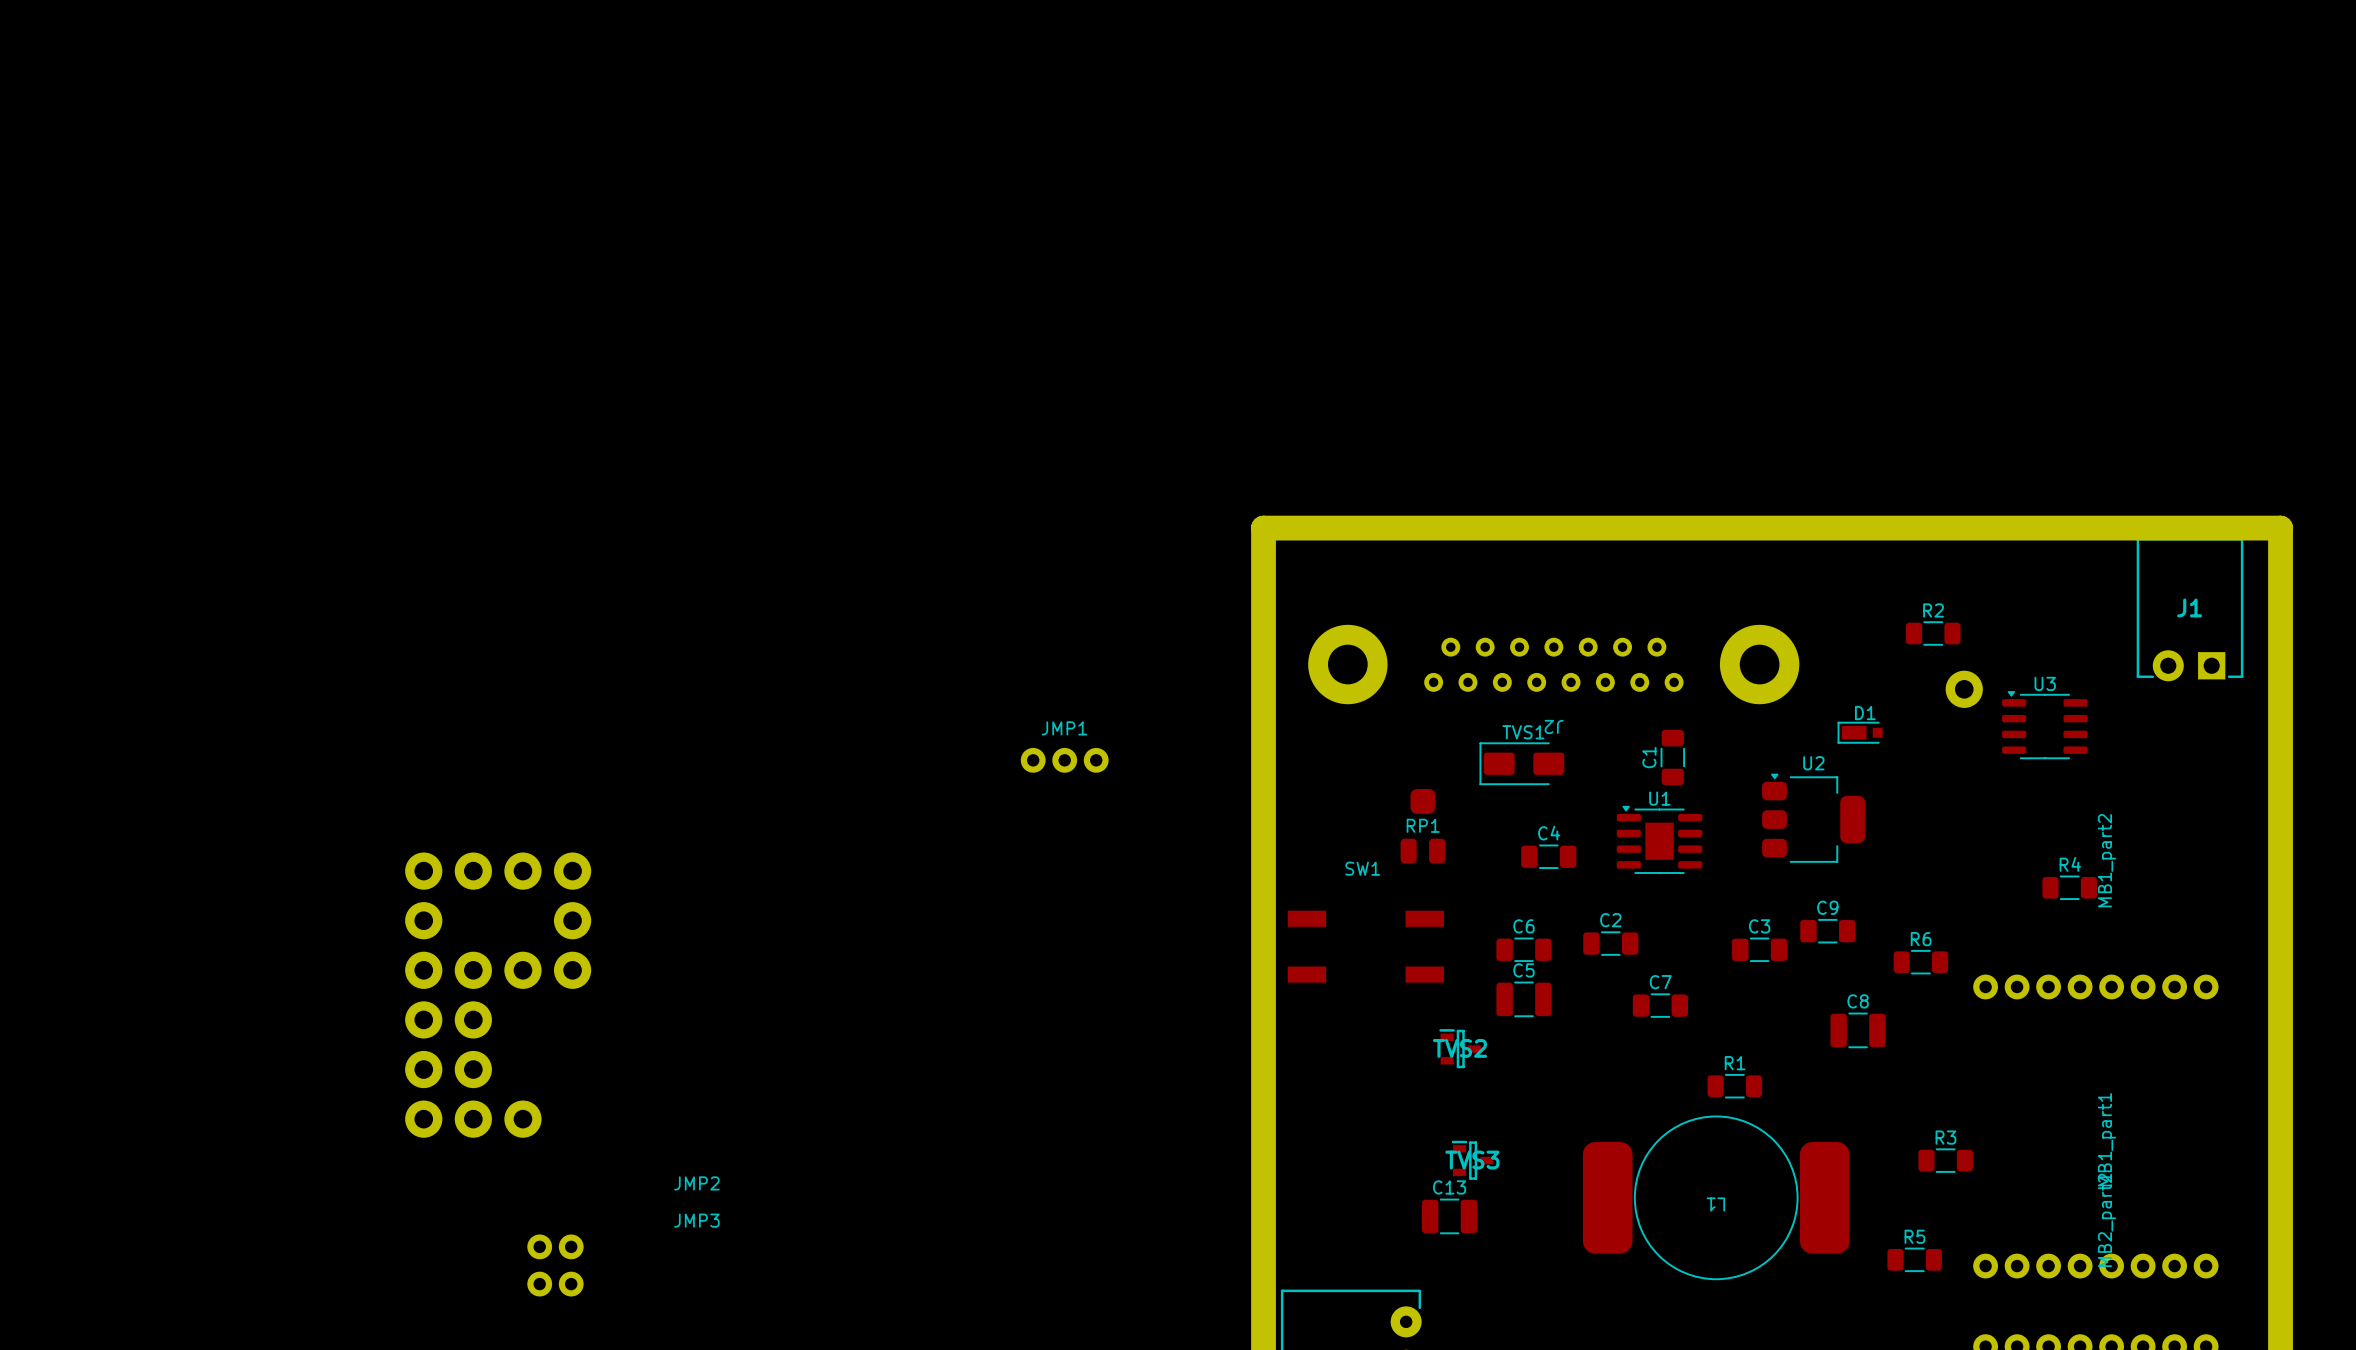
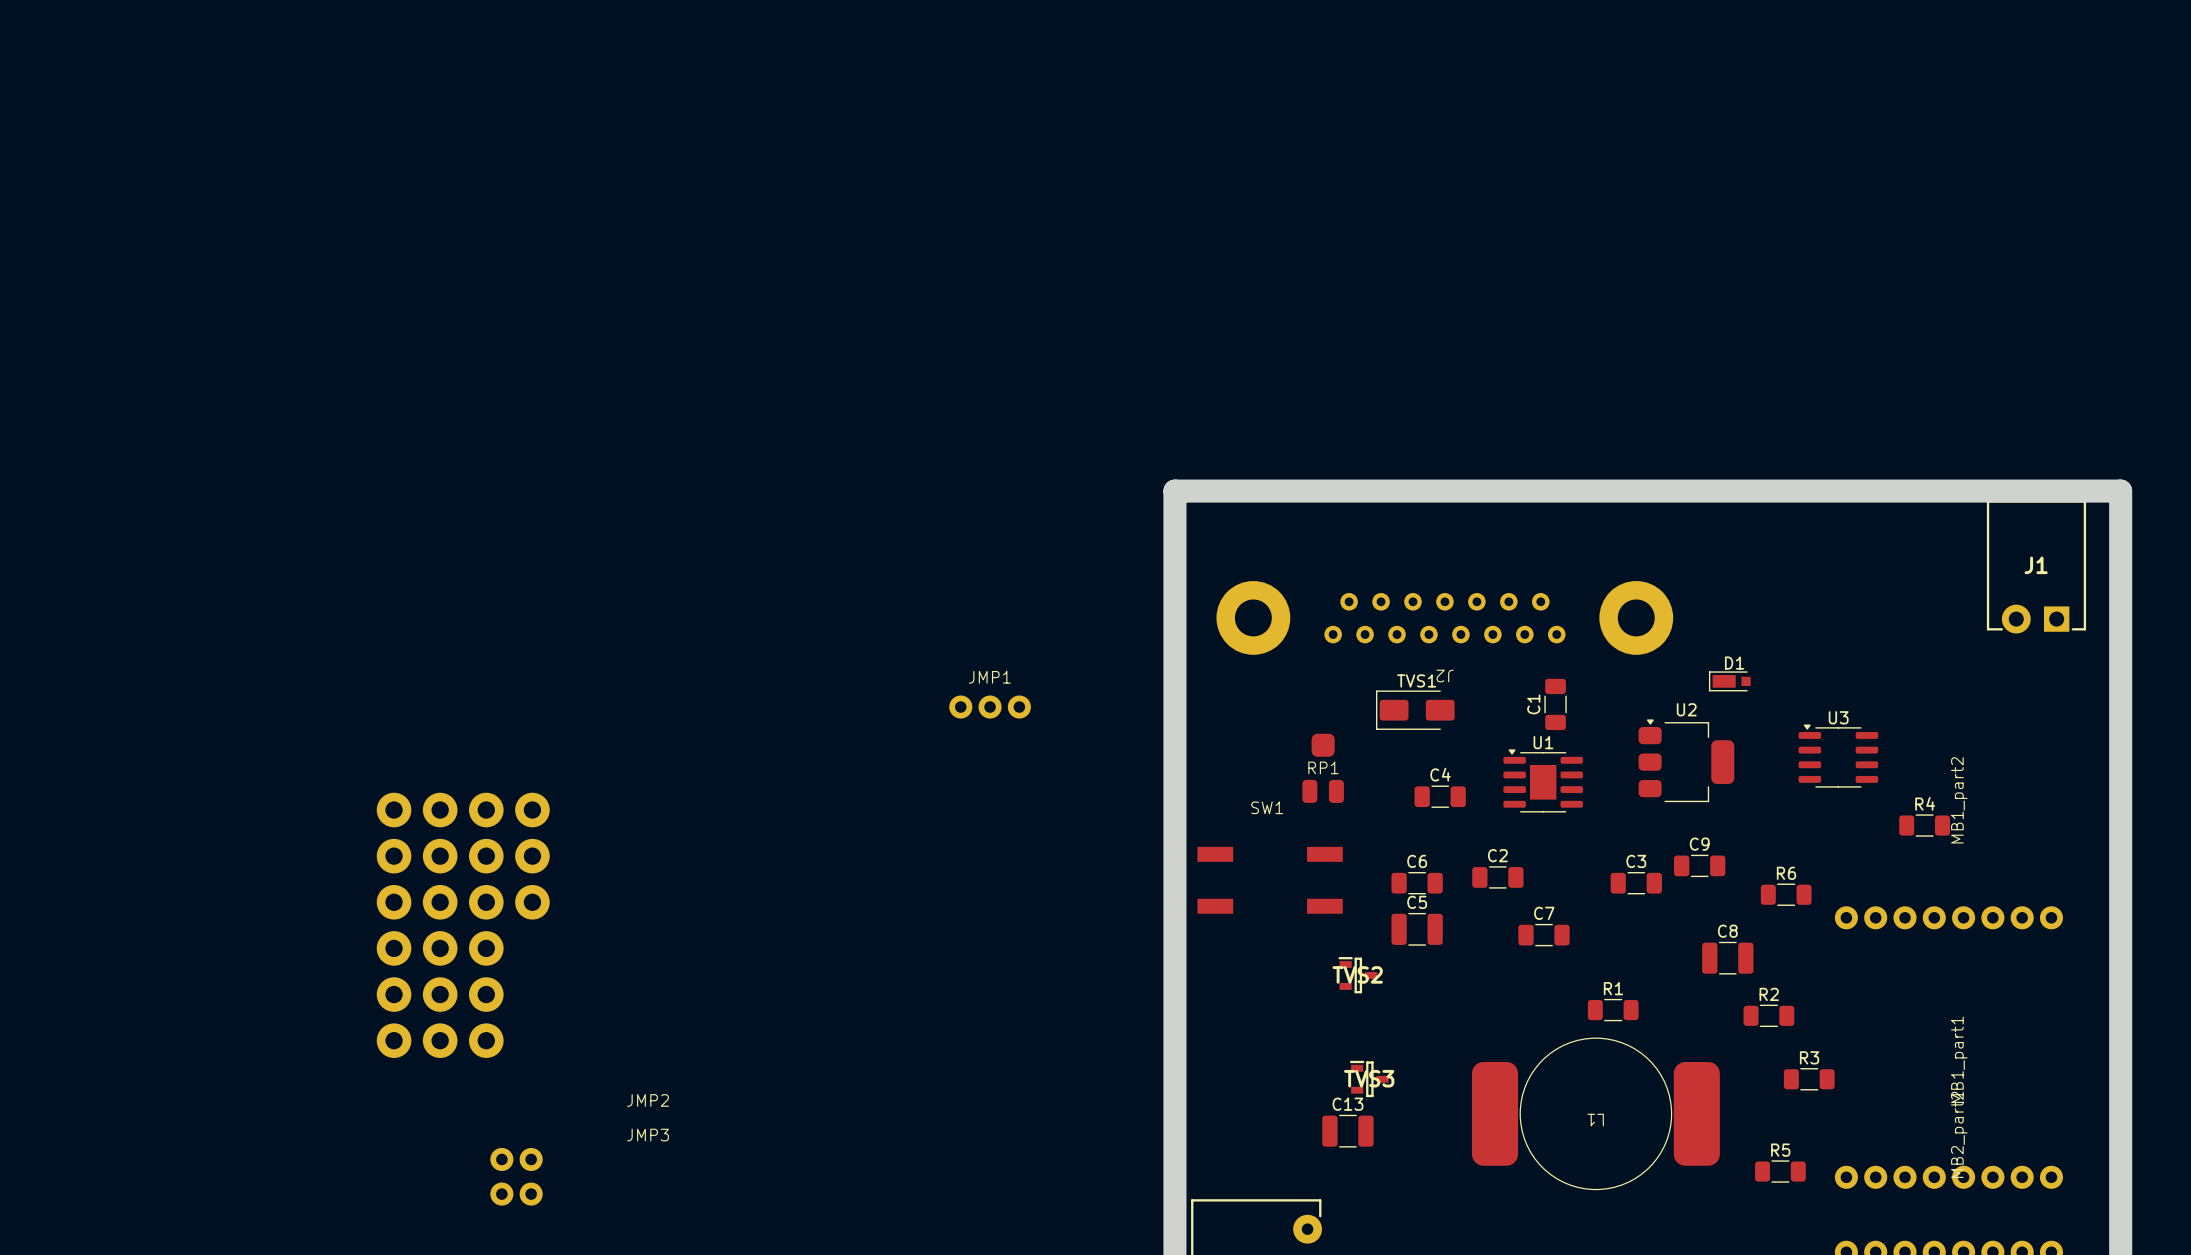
R2 position: (1933, 633) -> (1768, 1015)
part: (1964, 689) -> none
U3 position: (2044, 725) -> (1838, 756)
part: none -> (440, 856)
part: none -> (486, 856)
part: none -> (486, 948)
part: none -> (486, 994)

